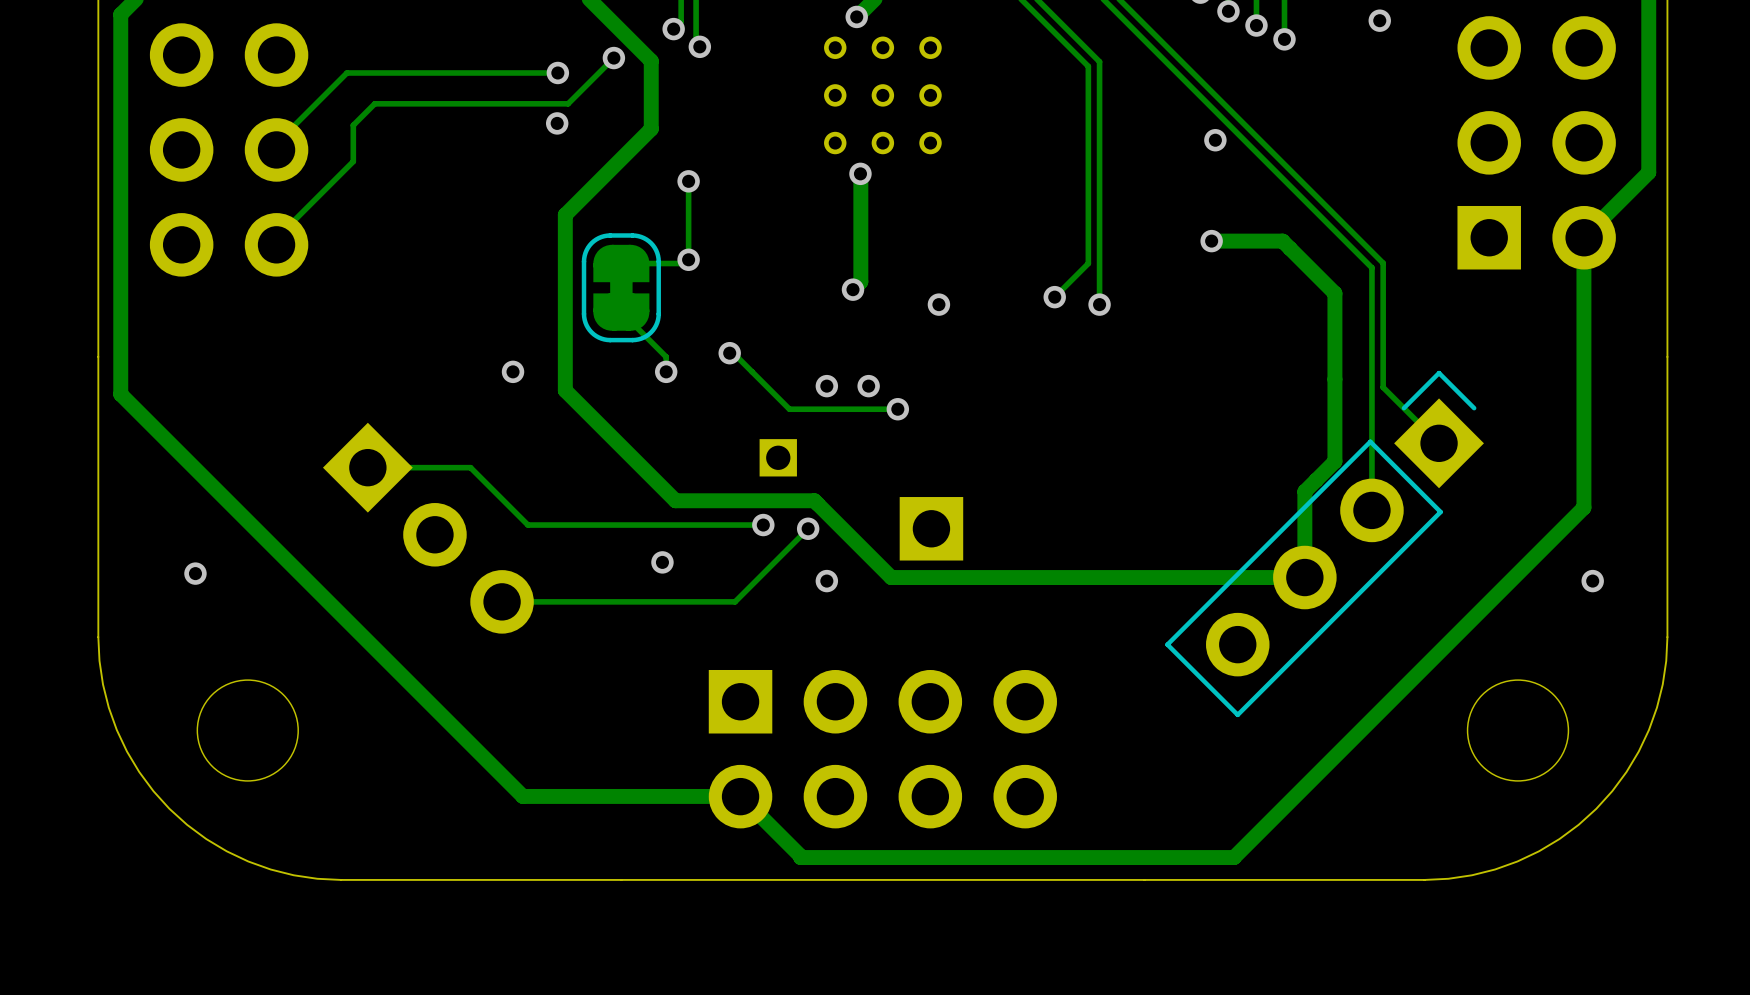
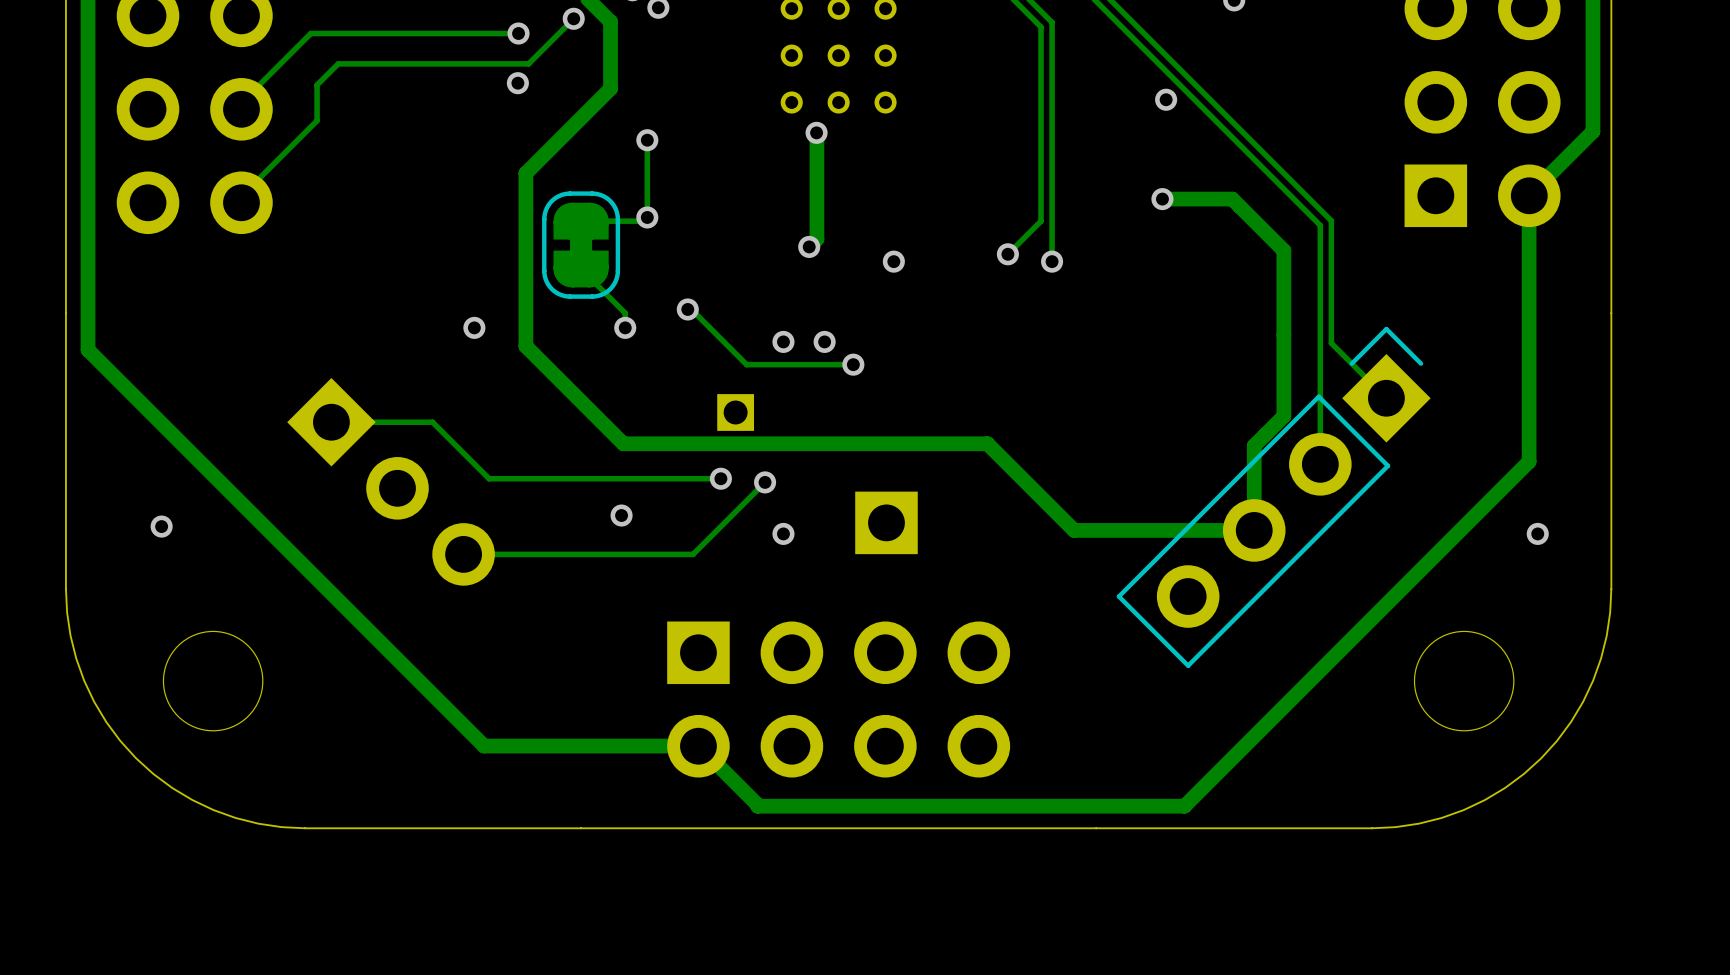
track: (664, 489) (675, 500) (814, 500) (891, 577) (1121, 577) -> (623, 443) (987, 443) (1074, 530)
part position: (931, 528) -> (886, 522)

